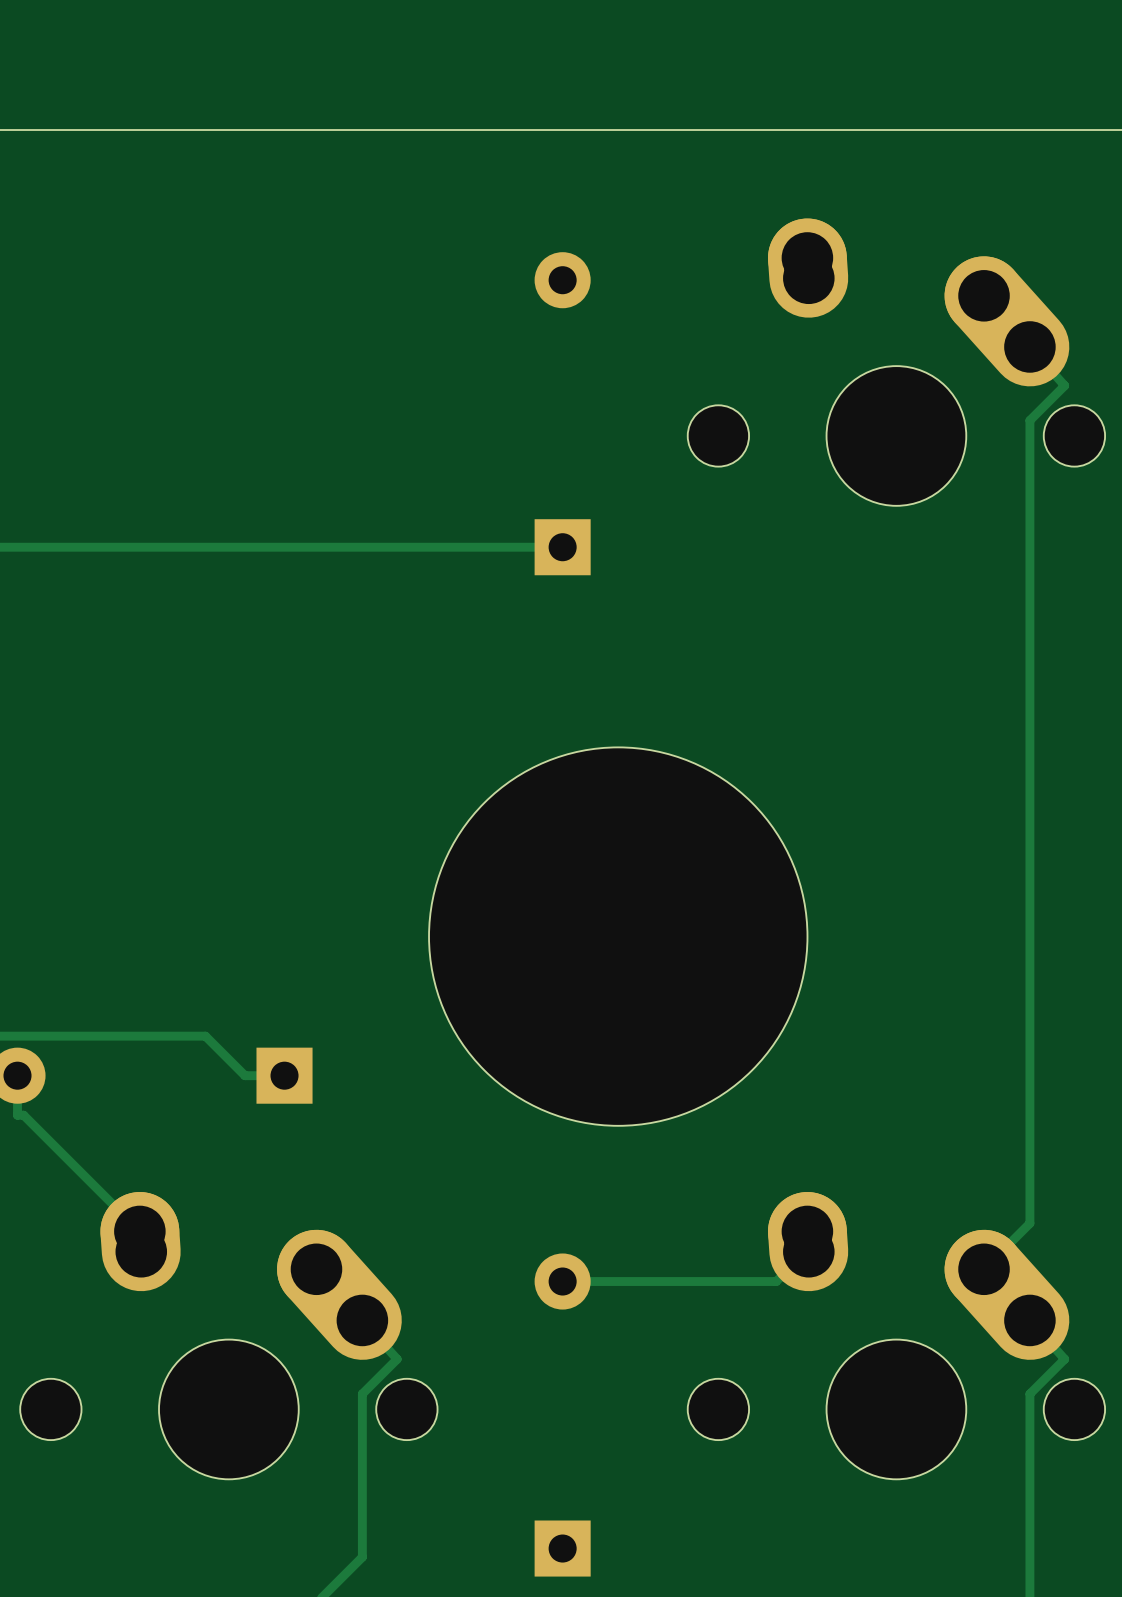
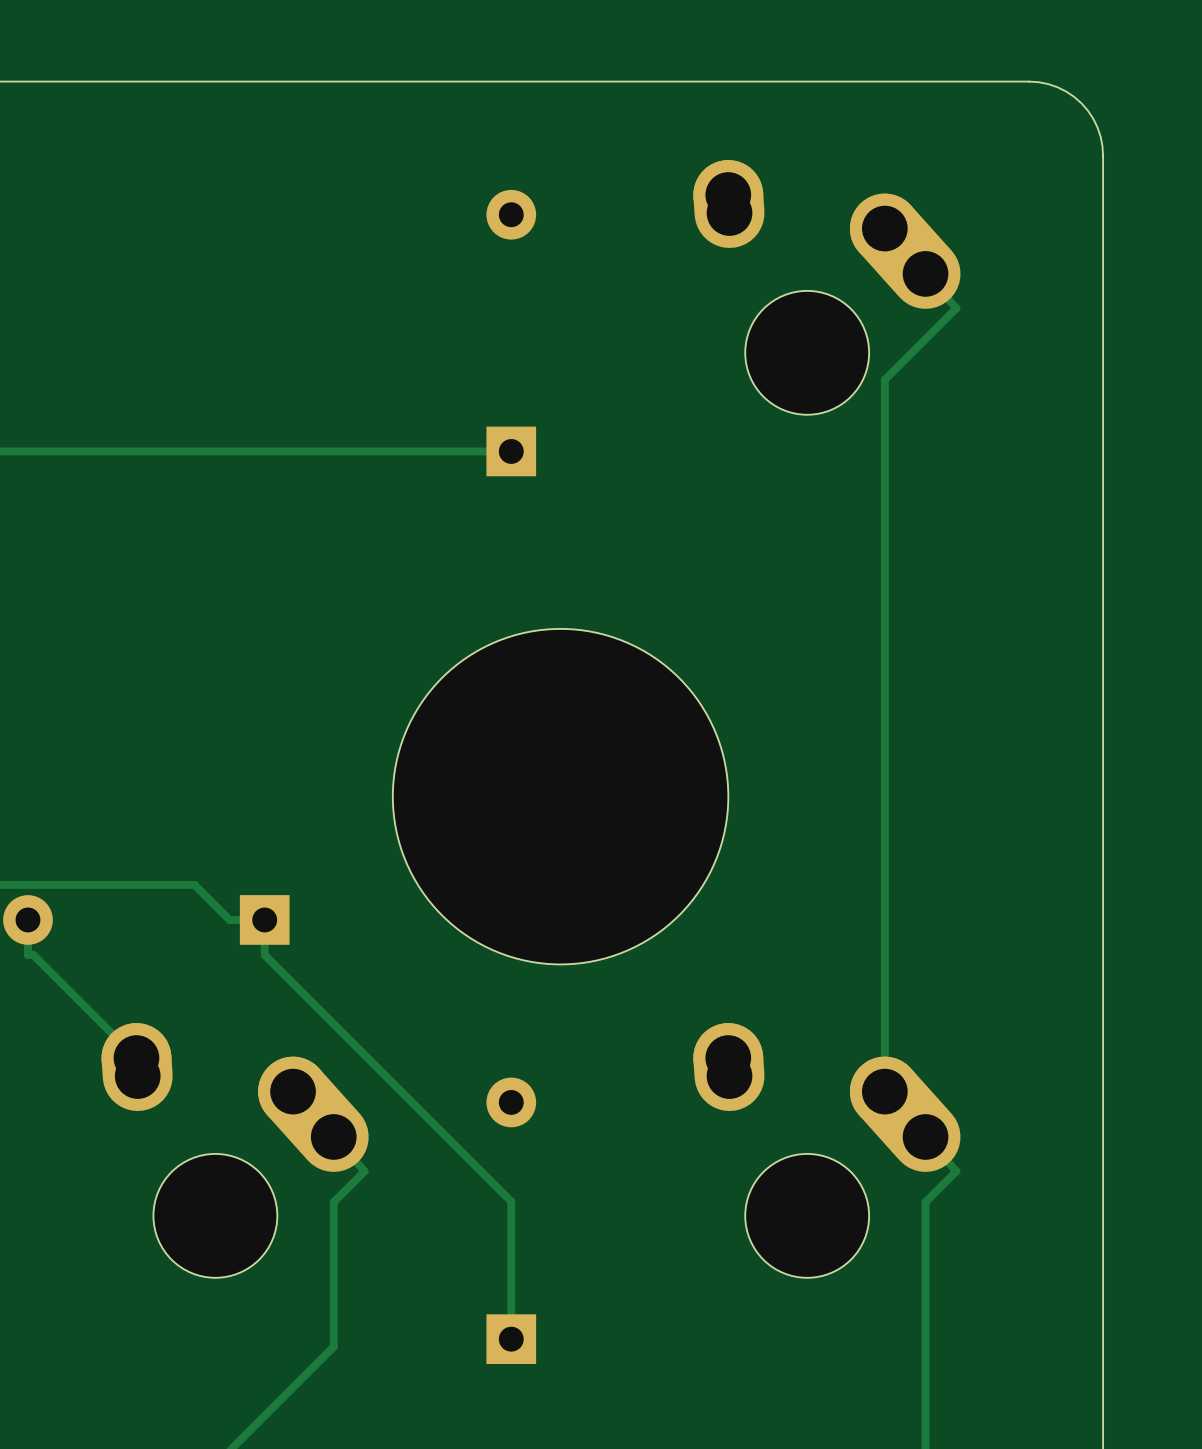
part footprint: [687, 218, 1106, 506] -> [693, 160, 961, 415]
track: (1029, 420) (1029, 1223) (984, 1269) (1029, 1315) (1029, 1320) -> (925, 339) (884, 379) (884, 1091)
track: none -> (264, 919) (264, 955) (511, 1201) (511, 1339)
part footprint: [20, 1192, 438, 1480] -> [101, 1023, 369, 1278]
part footprint: [687, 1192, 1106, 1480] -> [693, 1023, 961, 1278]
track: (807, 1250) (776, 1281) (562, 1281) -> none

